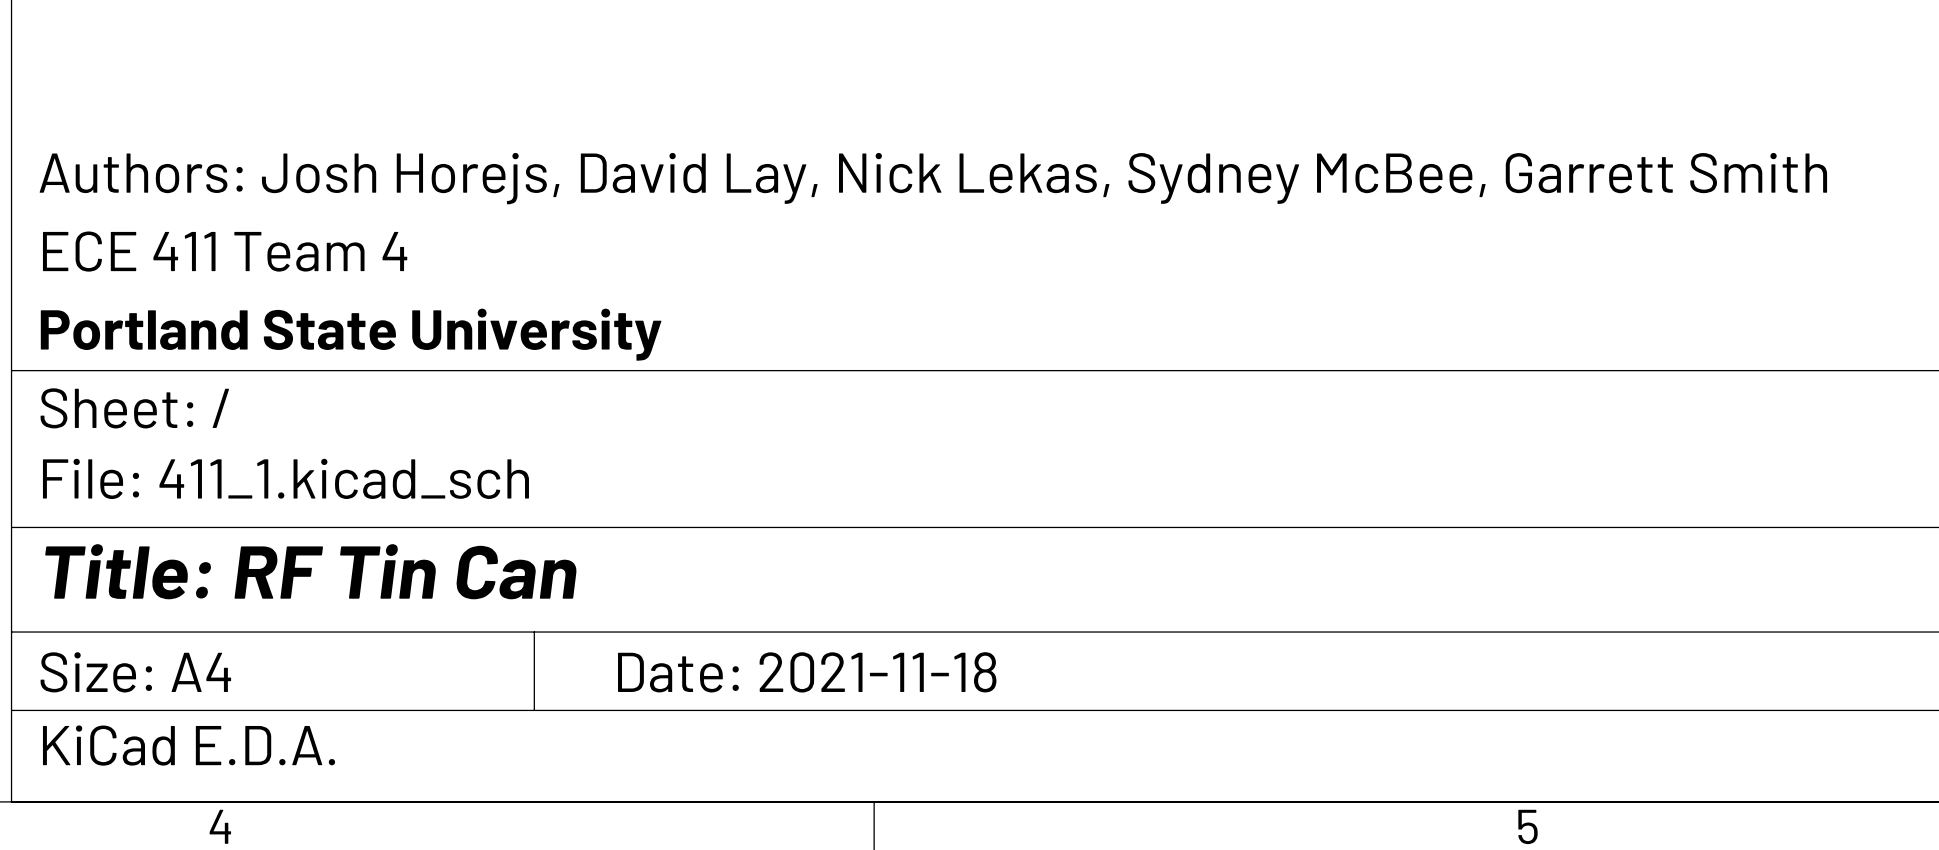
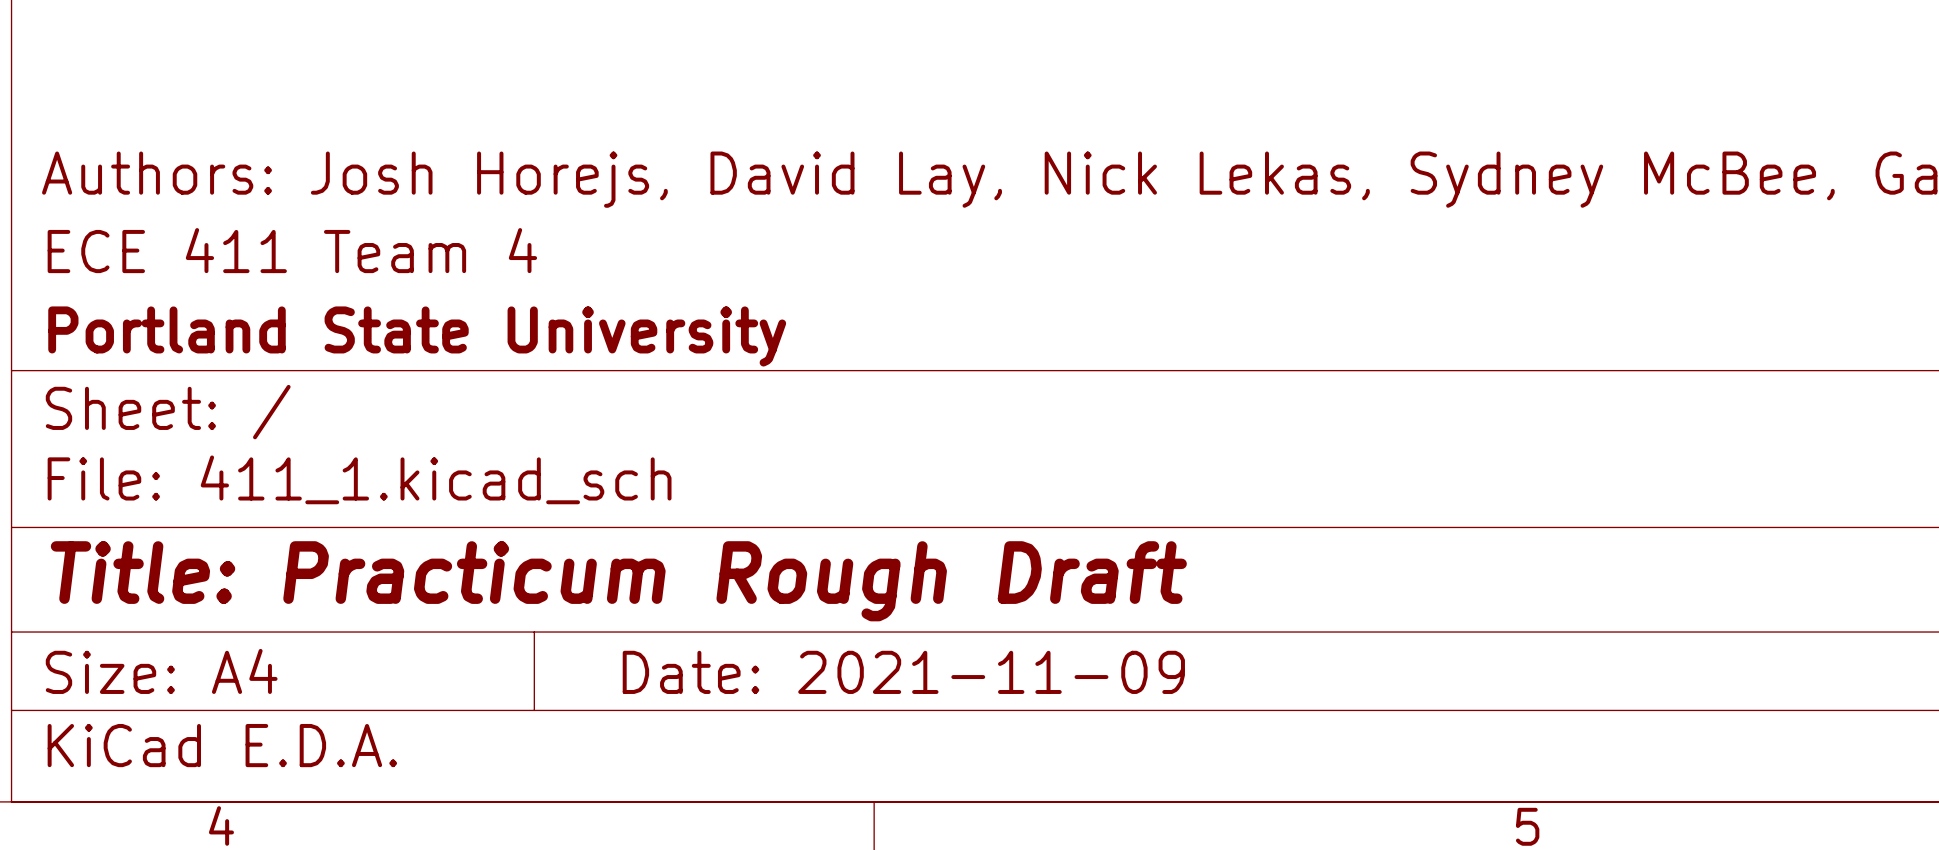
title block: Title: RF Tin Can (311, 571) -> Title: Practicum Rough Draft (618, 581)
title block: Date: 2021-11-18 (807, 672) -> Date: 2021-11-09 (903, 672)

